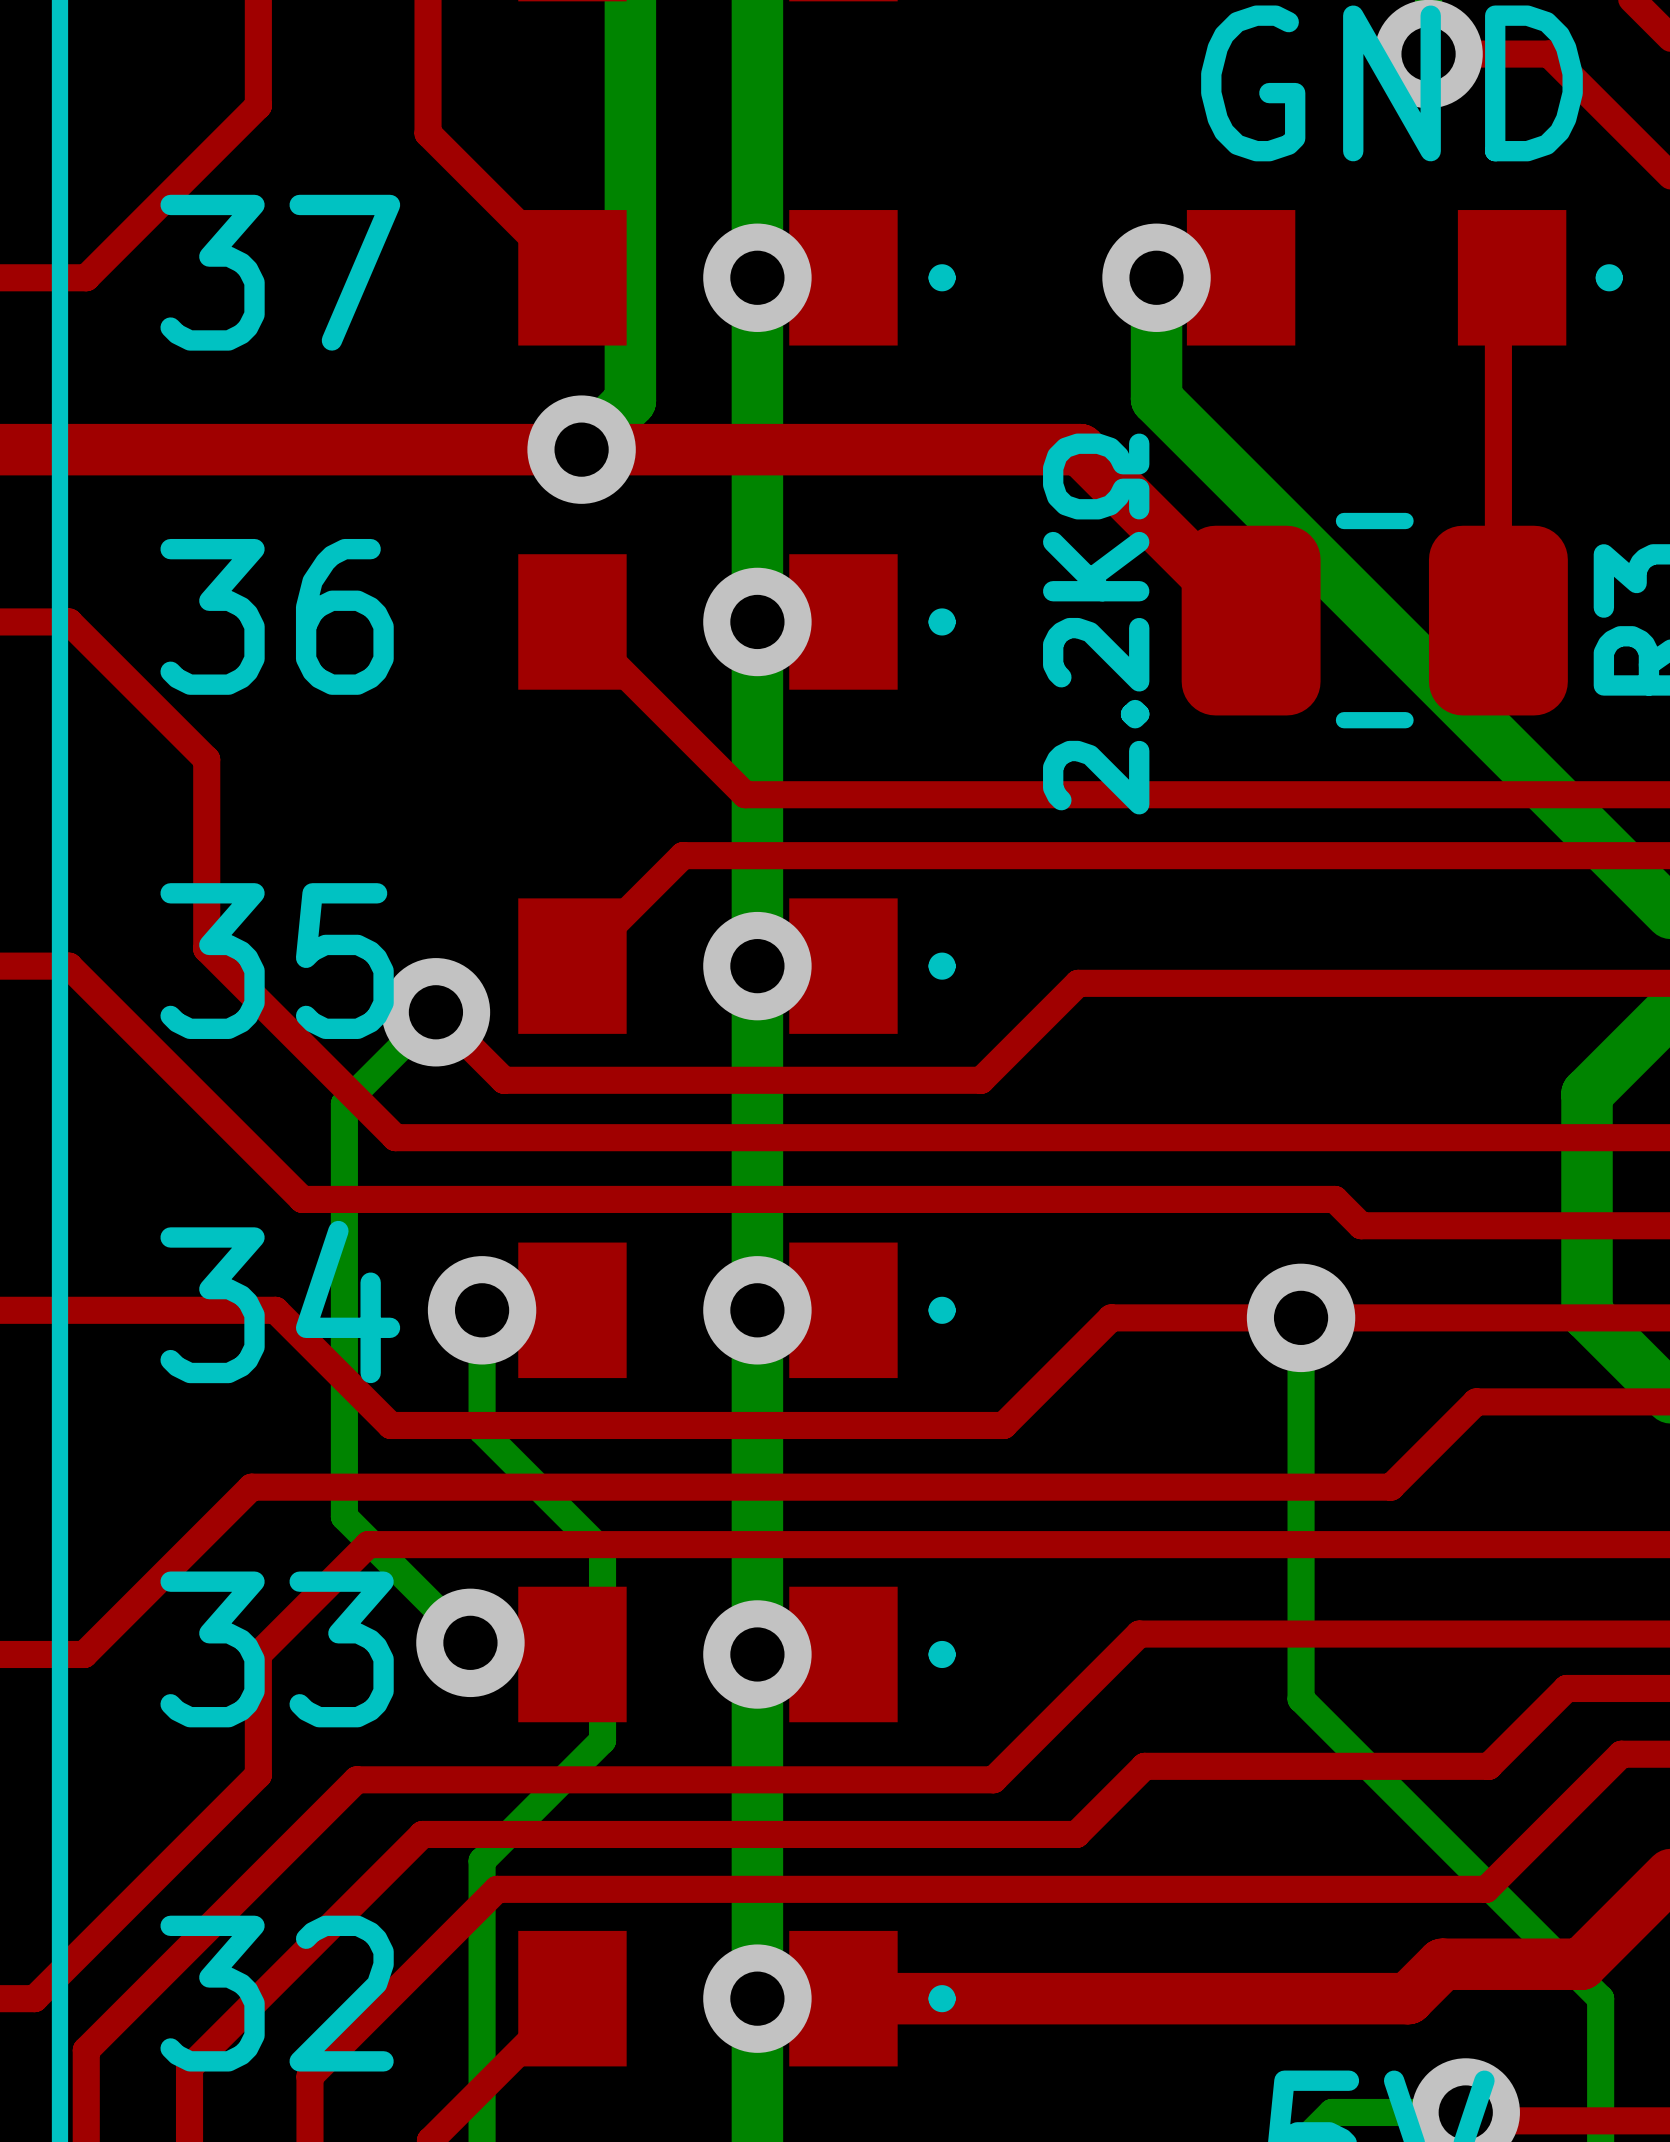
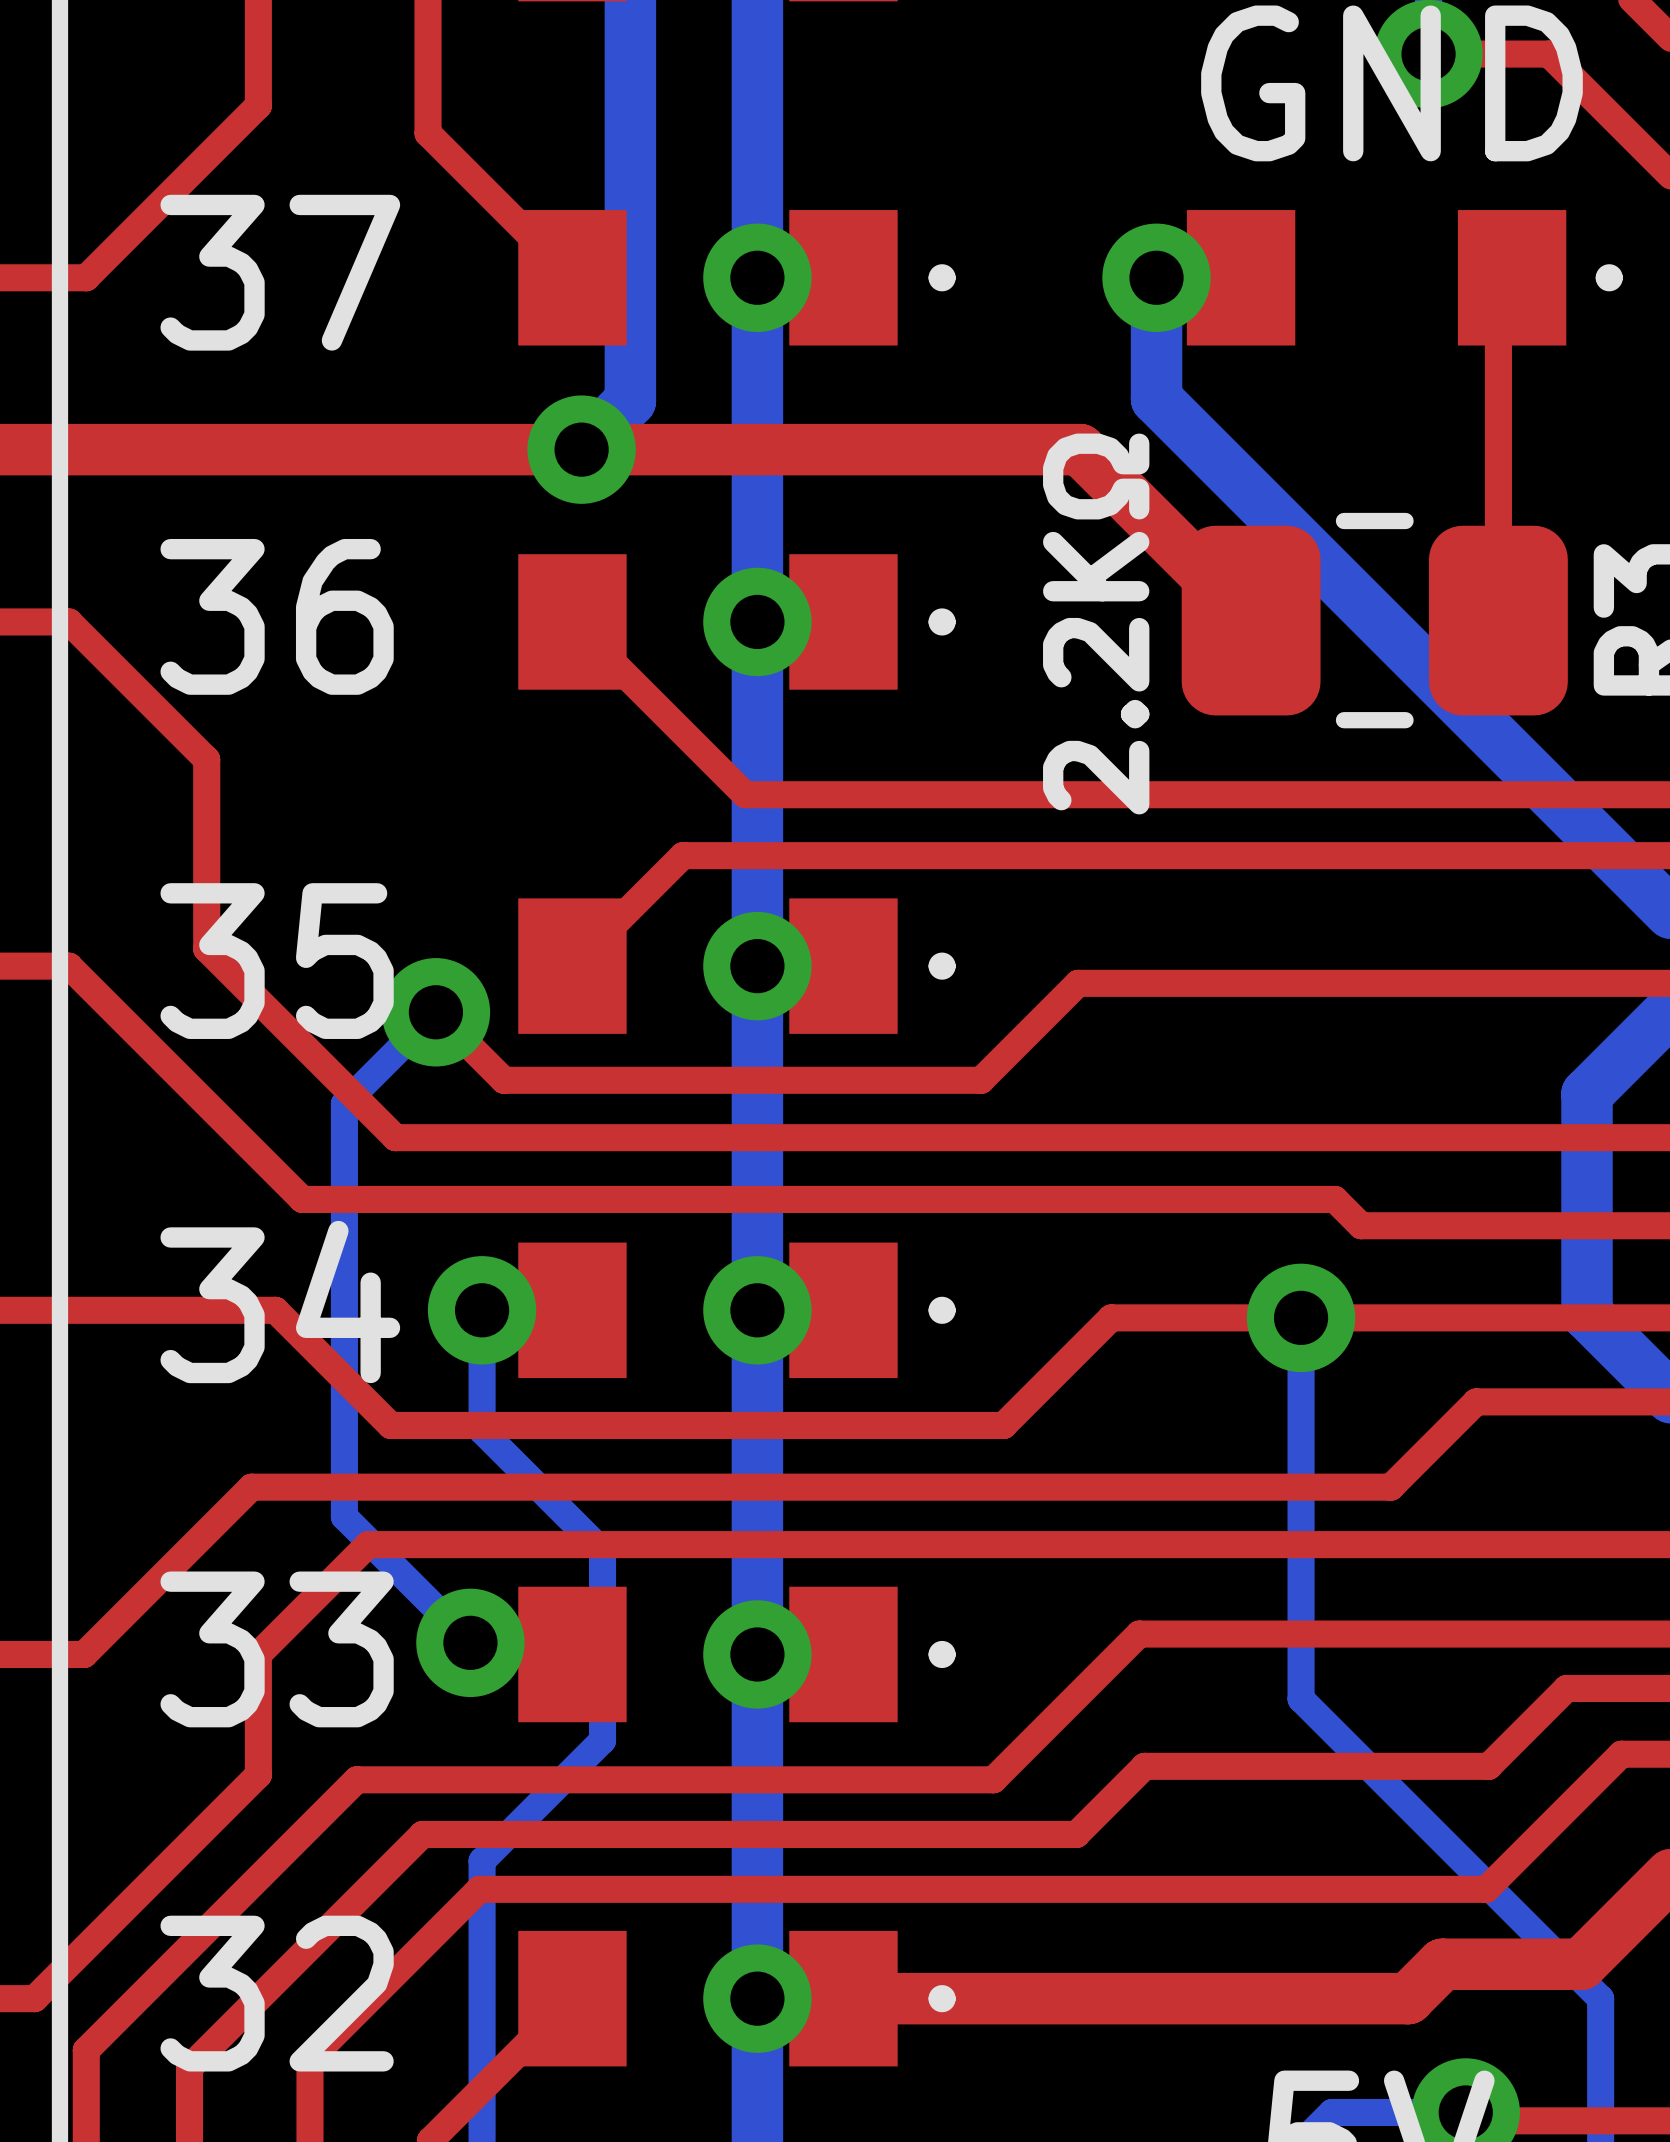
top track: (497, 1889) (309, 2076) -> (497, 1889) (479, 1889) (309, 2058) (309, 2076)

